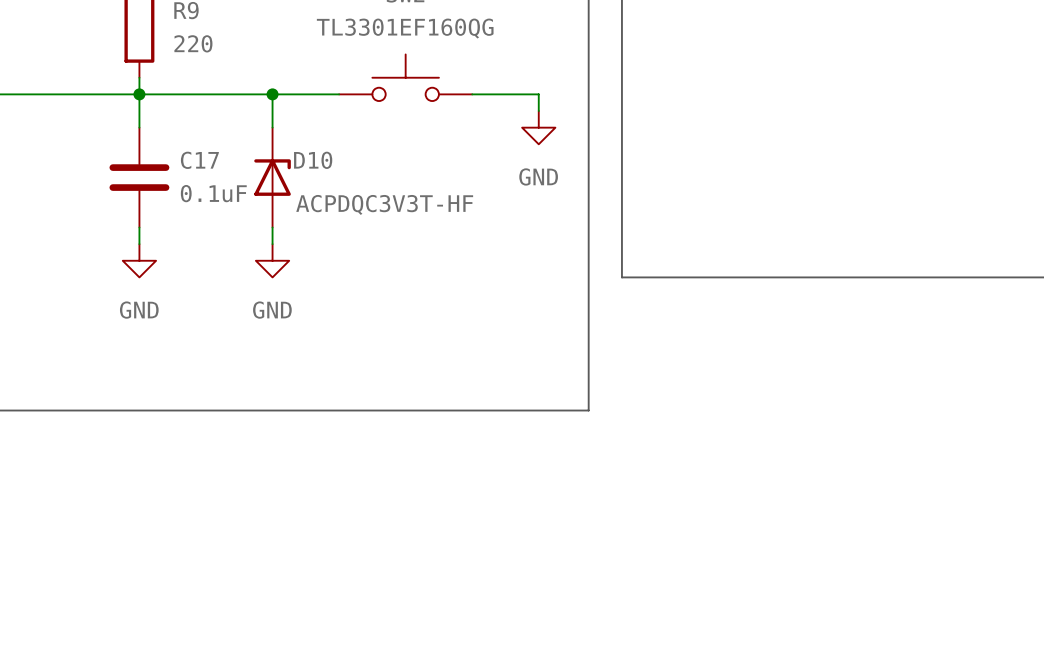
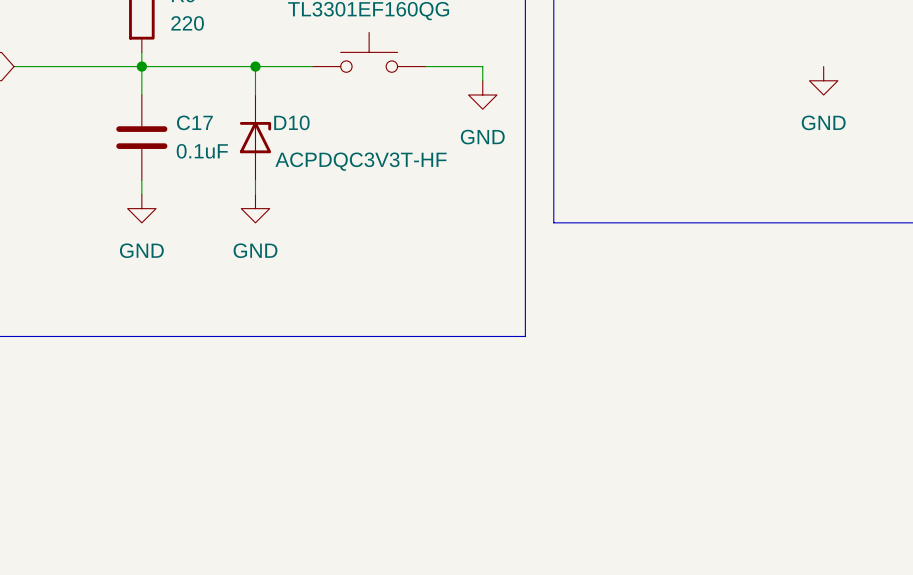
power symbol: none -> GND (823, 80)

